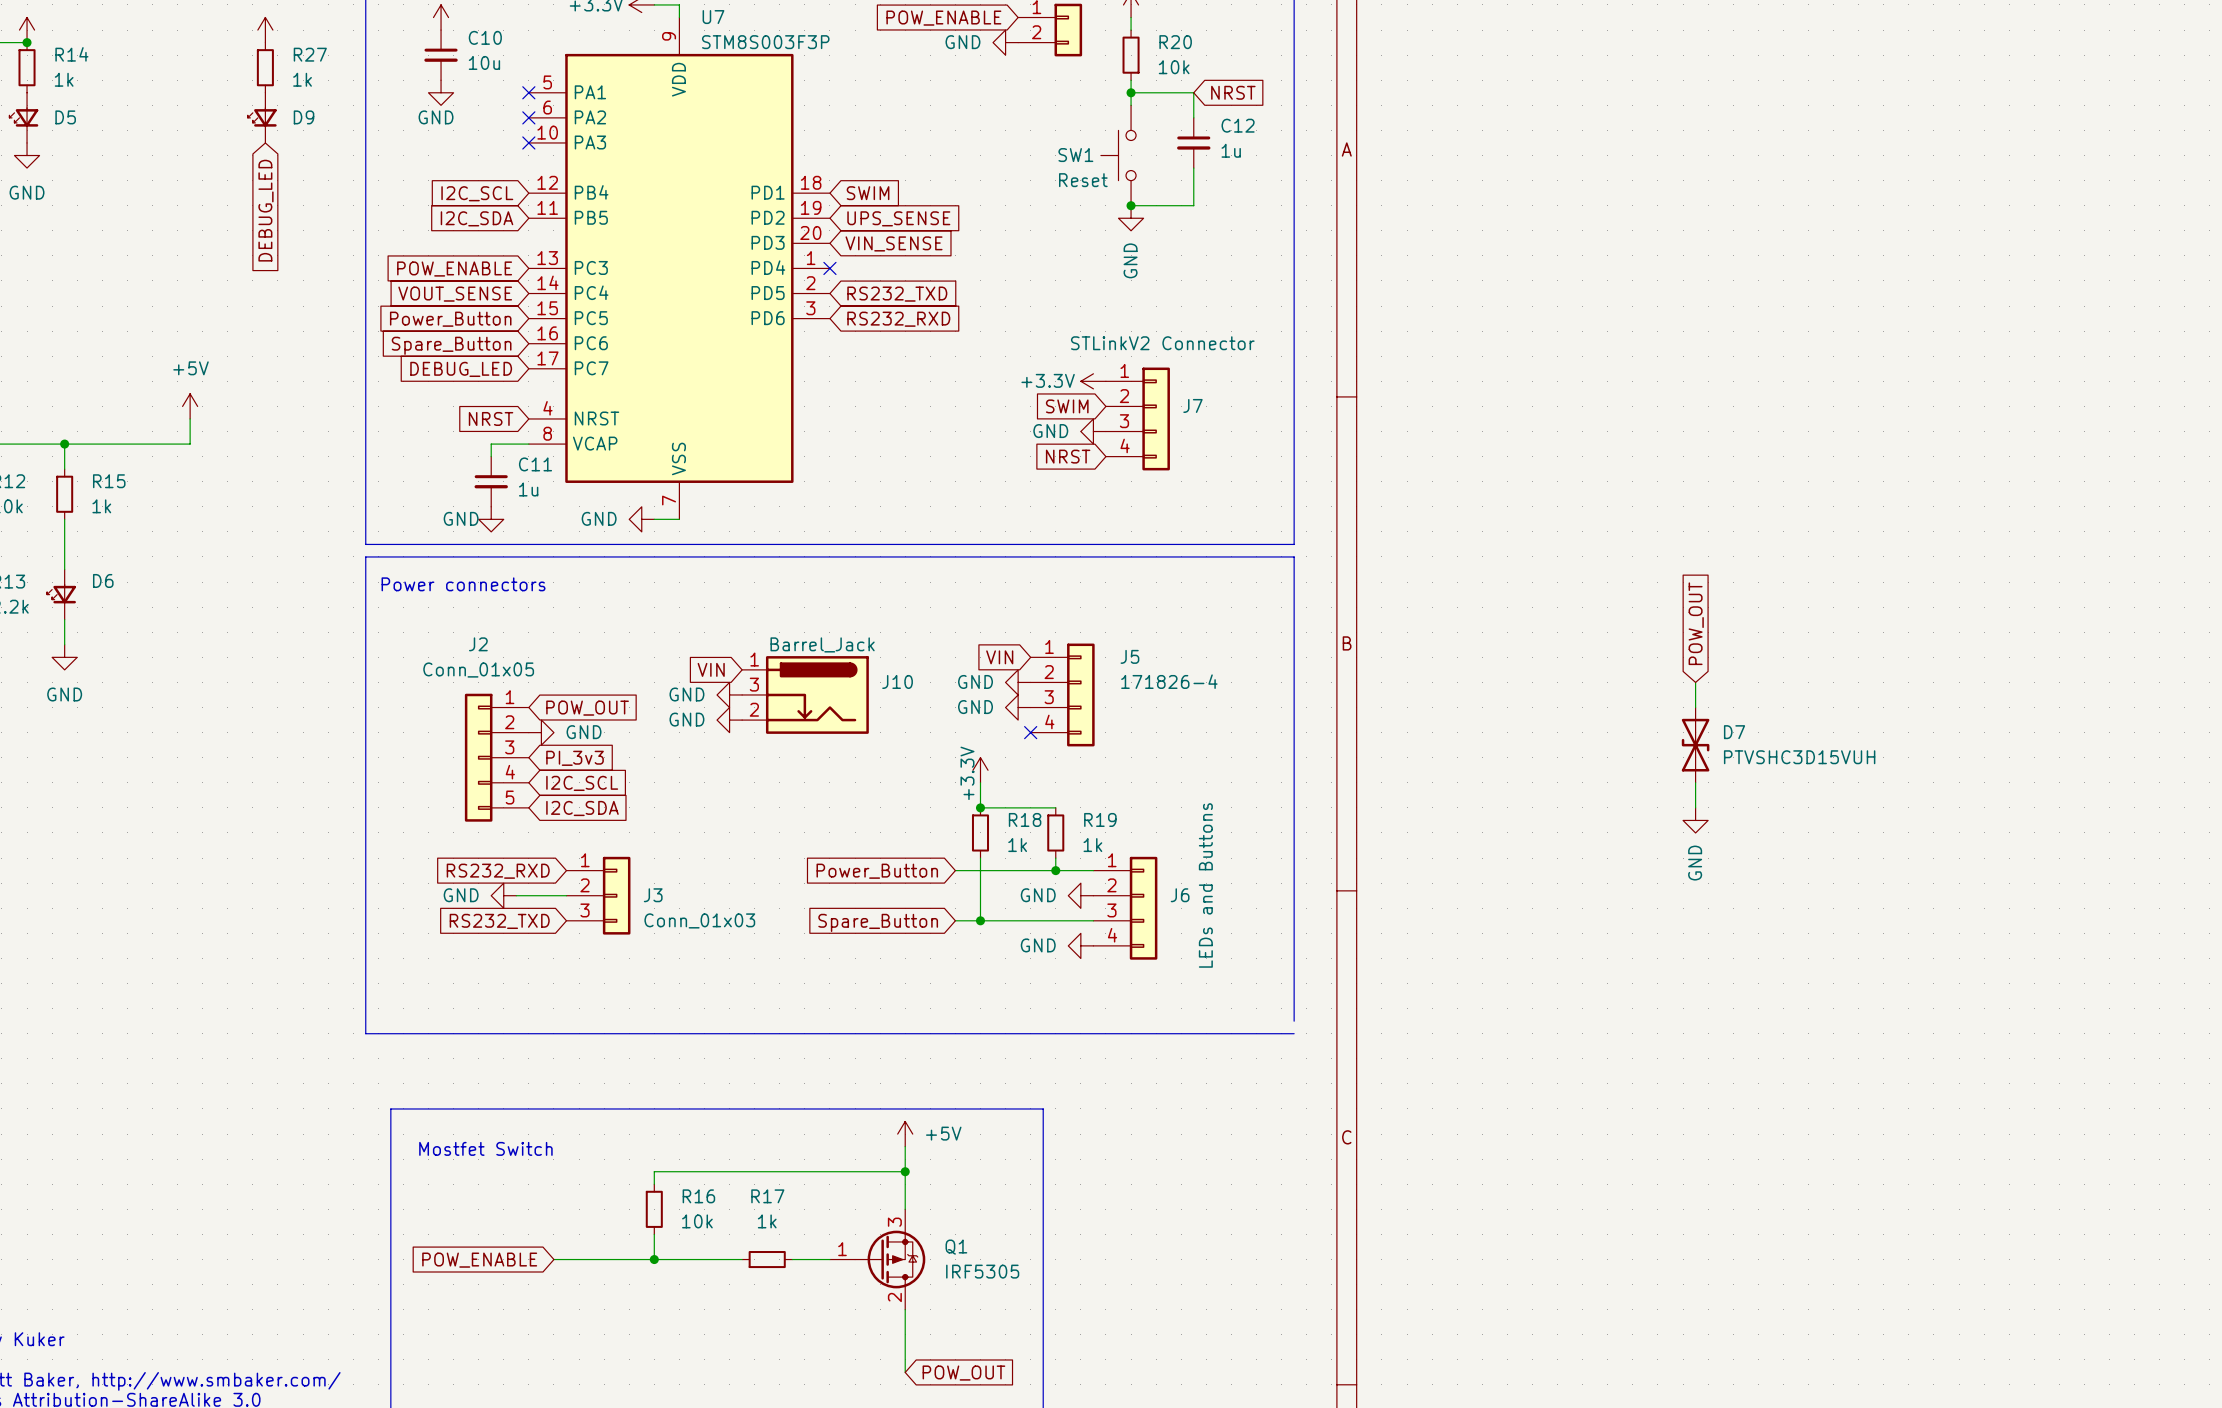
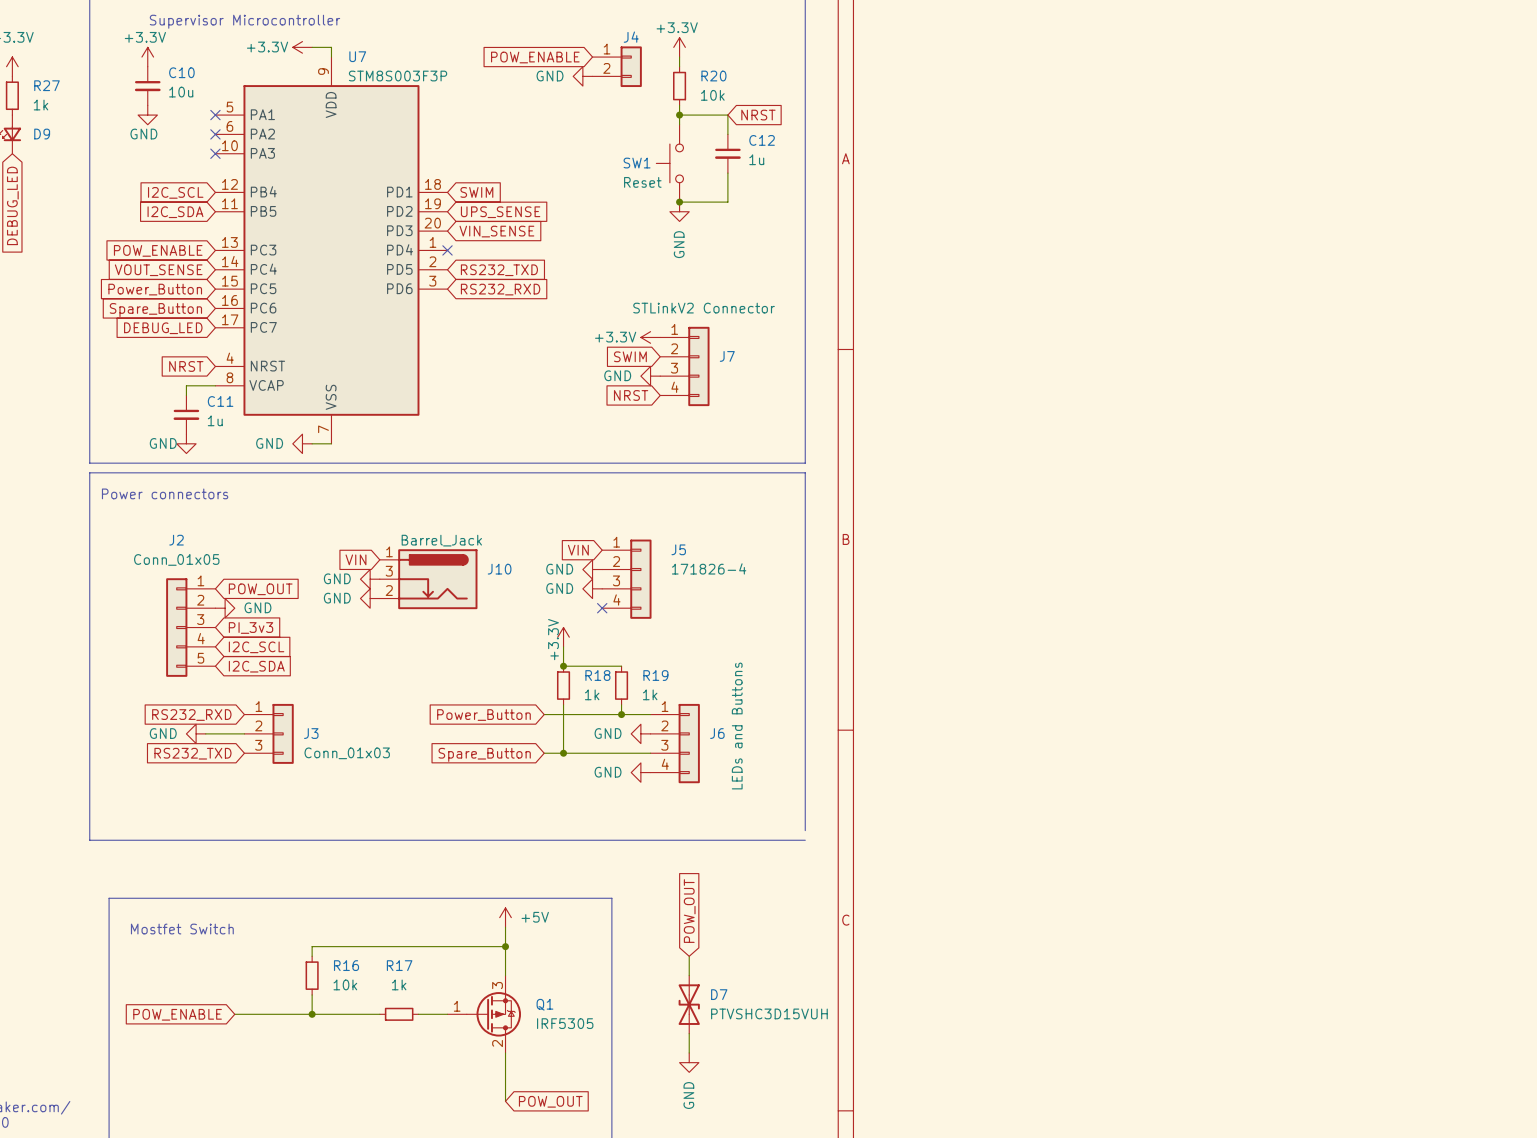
global label: POW_OUT (1696, 623) -> none
wire: (1695, 682) (1695, 707) -> none
D7 position: (1695, 745) -> (689, 1004)
wire: (1695, 782) (1695, 807) -> none
power symbol: GND (1695, 820) -> none
global label: none -> POW_OUT (689, 911)
wire: none -> (689, 956) (689, 975)
wire: none -> (689, 1033) (689, 1052)
power symbol: none -> GND (689, 1062)

